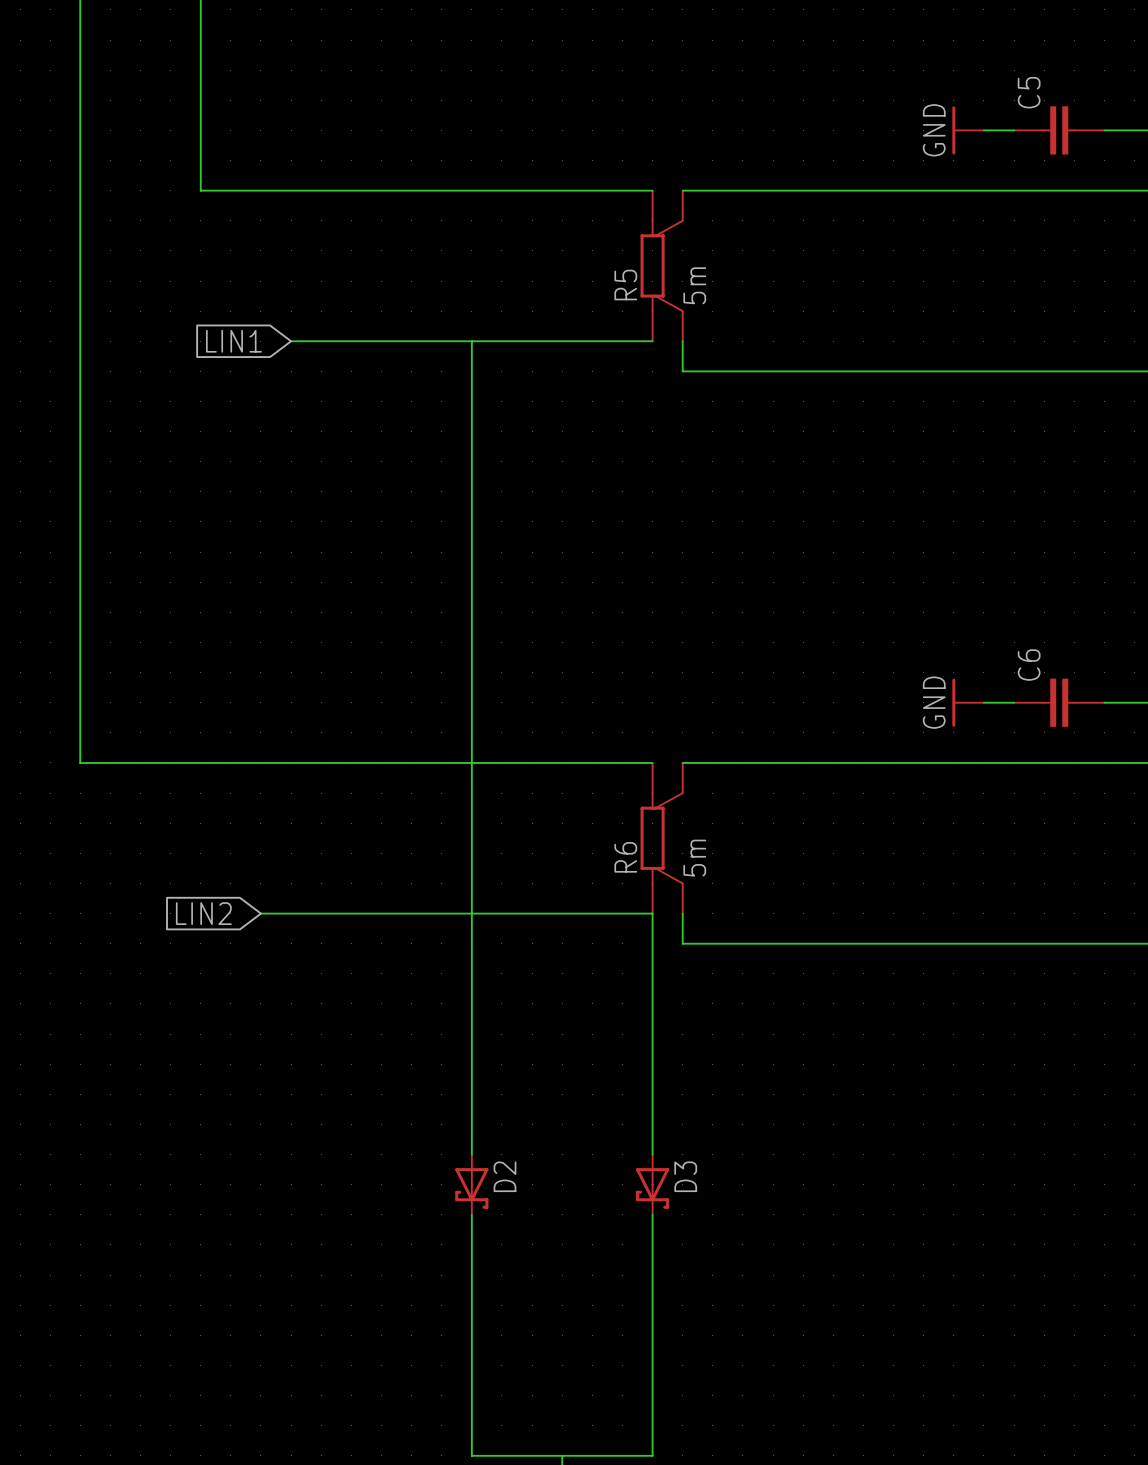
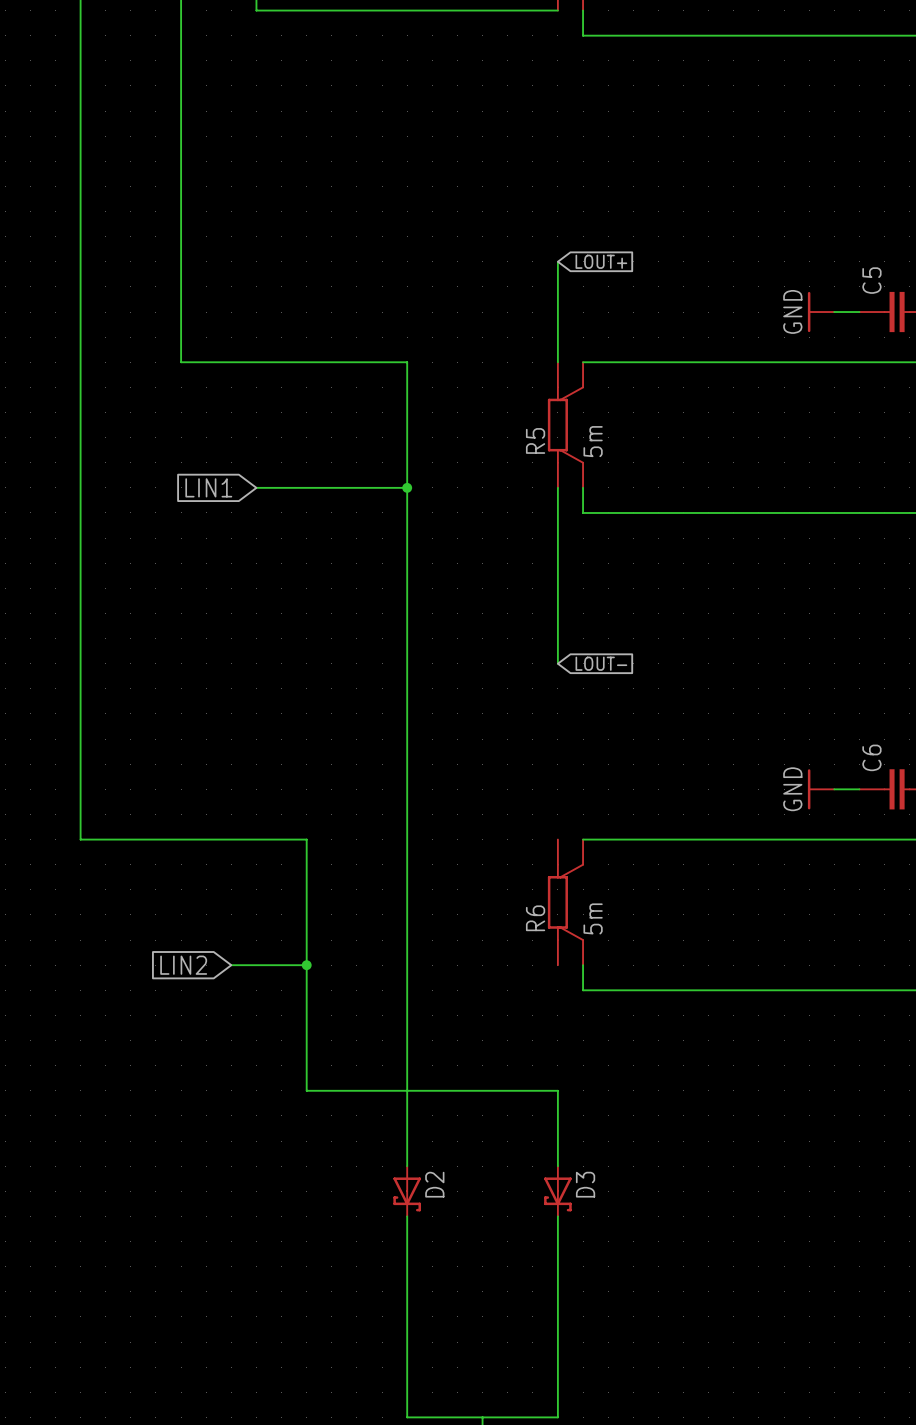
global label: none -> LOUT+ (601, 261)
wire: (471, 190) (652, 190) -> (557, 261) (557, 362)
wire: (471, 341) (652, 341) -> (407, 487) (407, 362)
junction: none -> (407, 487)
wire: none -> (557, 487) (557, 663)
global label: none -> LOUT- (601, 663)
wire: (351, 762) (652, 762) -> none
wire: (351, 913) (652, 913) (652, 1064) -> (306, 839) (306, 1090) (557, 1090)
junction: none -> (306, 965)

